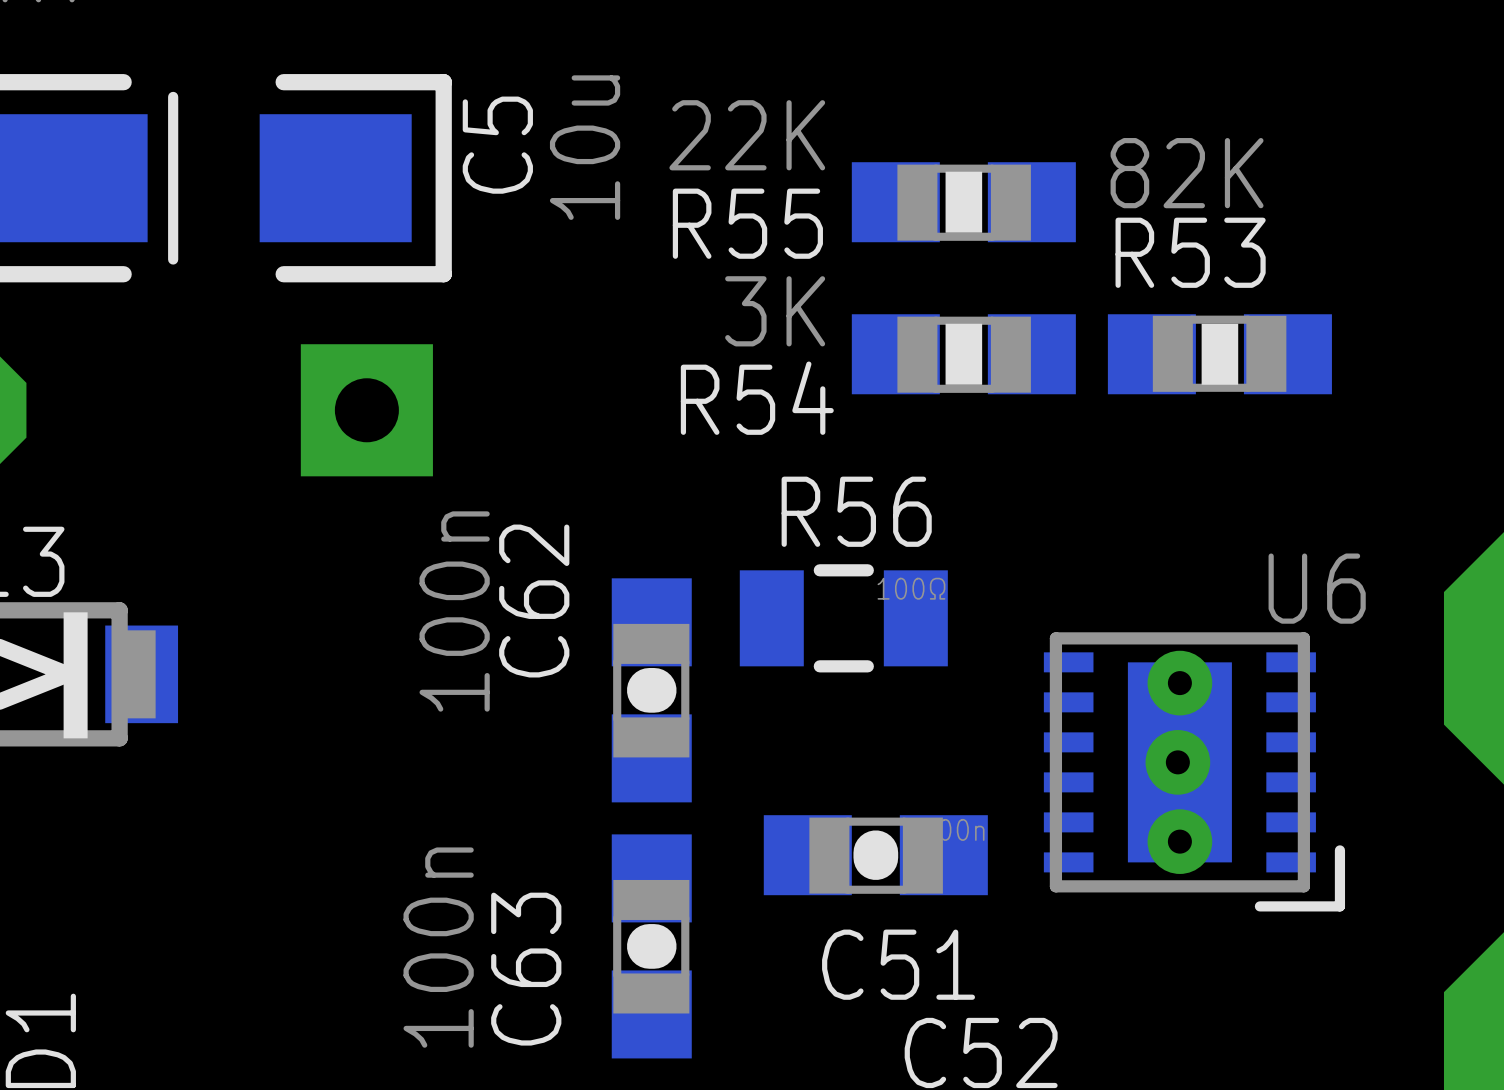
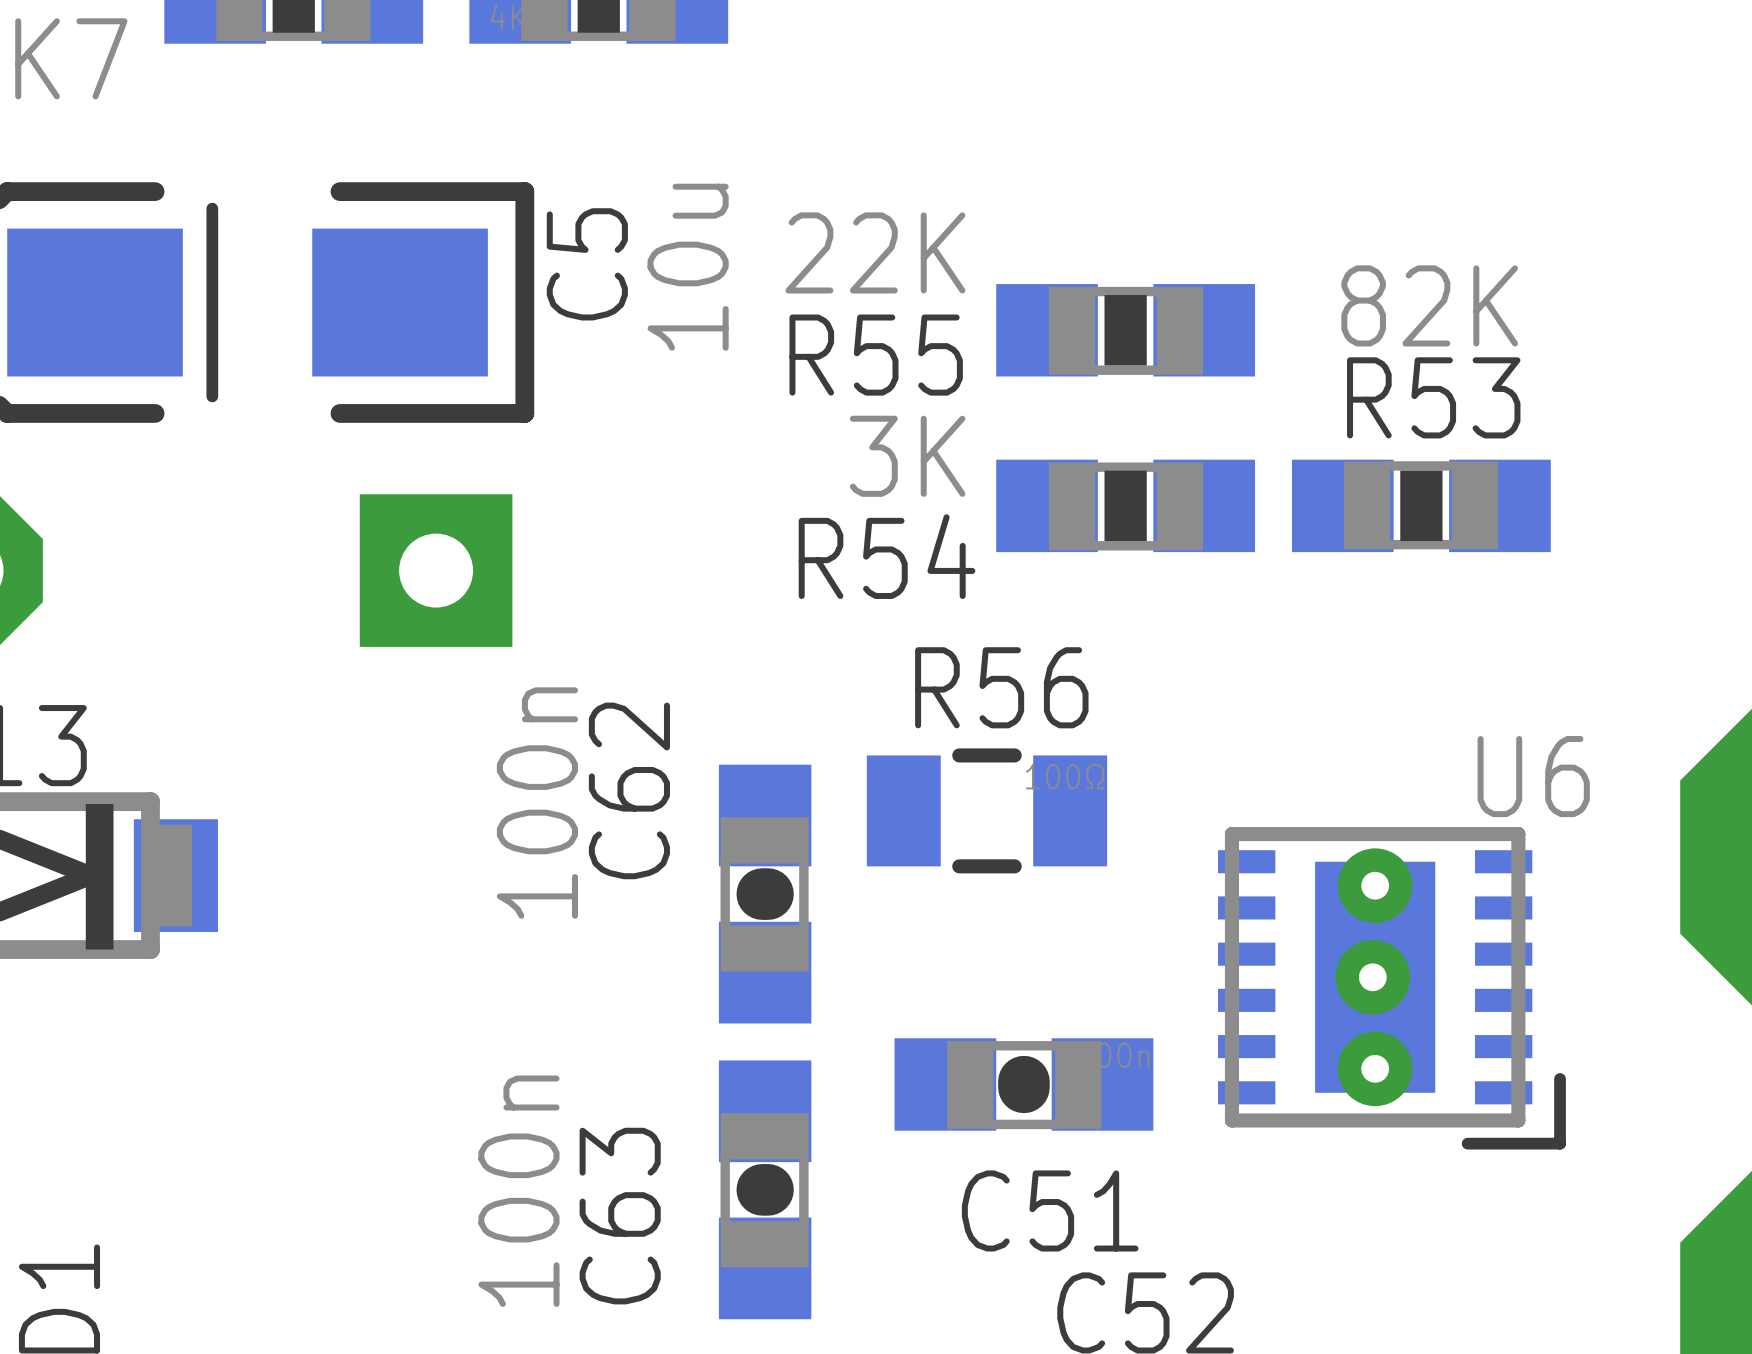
R53 value position: 82K (1187, 173) -> 82K (1429, 305)
R53 name position: R53 (1190, 252) -> R53 (1433, 397)

